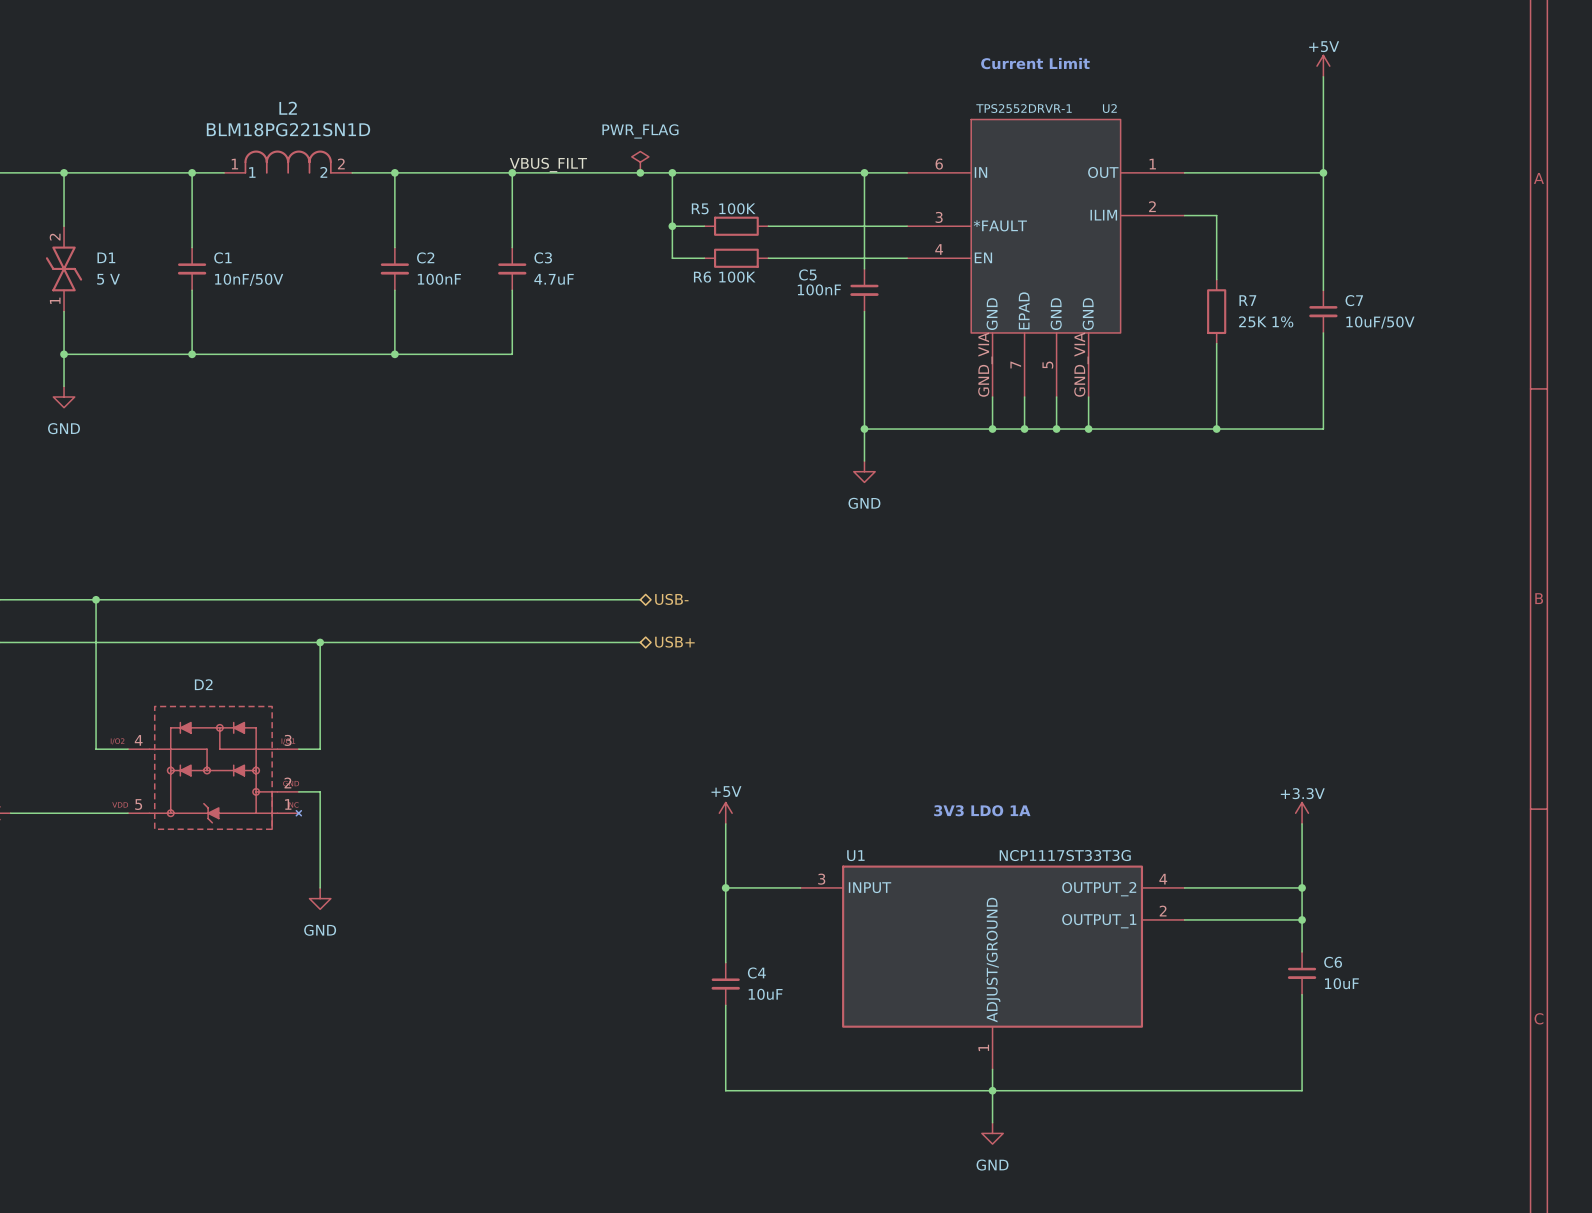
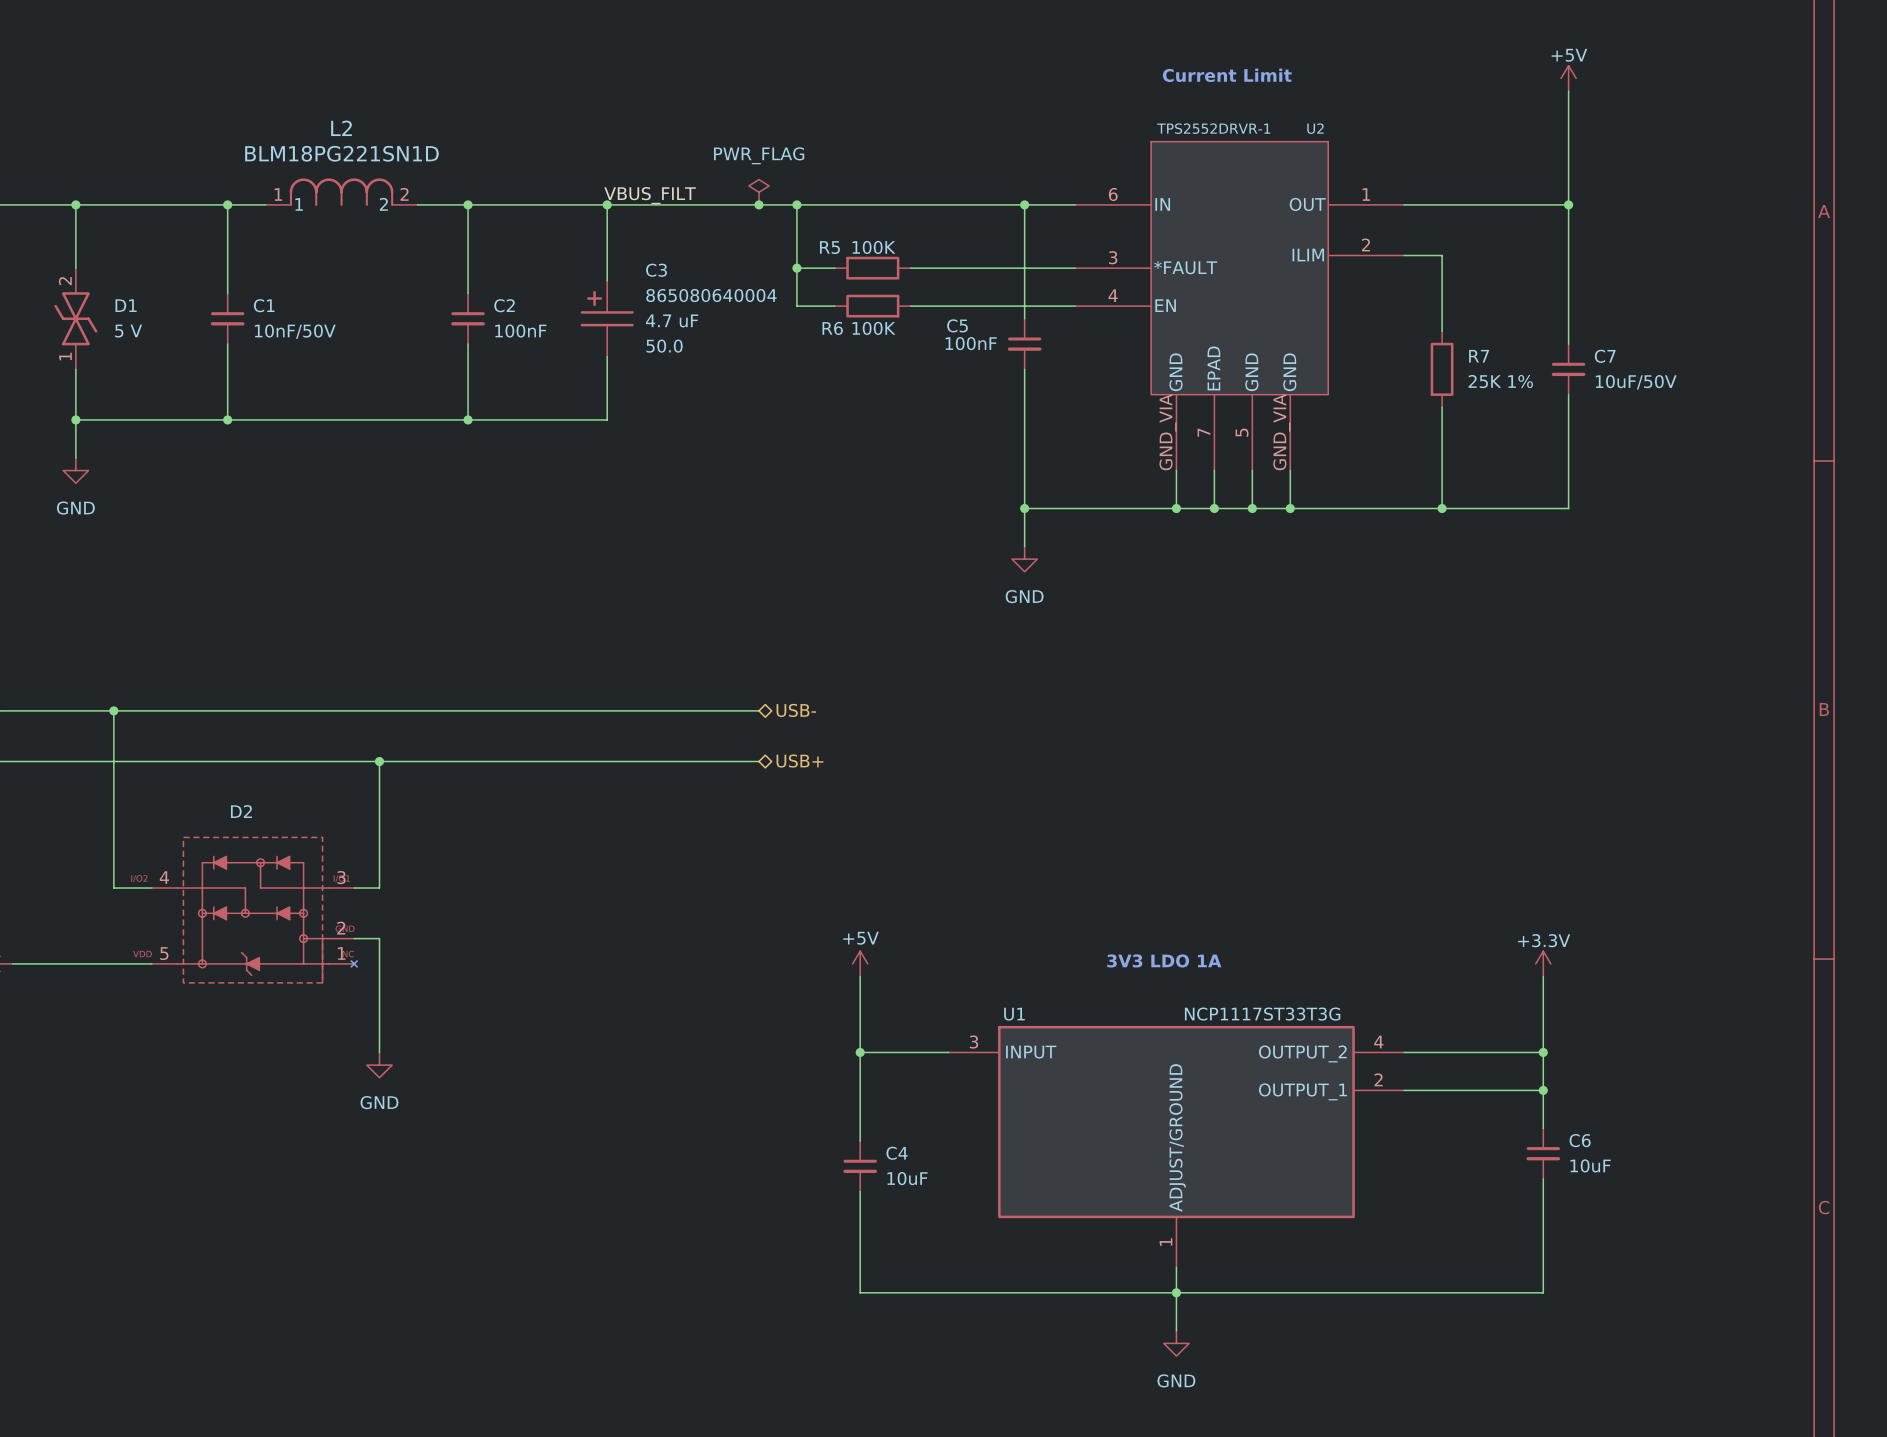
C3 symbol: [498, 247, 527, 291] -> [580, 280, 634, 357]
C3 text: none -> 865080640004 (711, 295)
C3 name position: C3 (543, 257) -> C3 (656, 270)
C3 text: none -> 4.7 uF (672, 320)
C3 value: 4.7uF (554, 279) -> none
C3 text: none -> 50.0 (664, 346)

